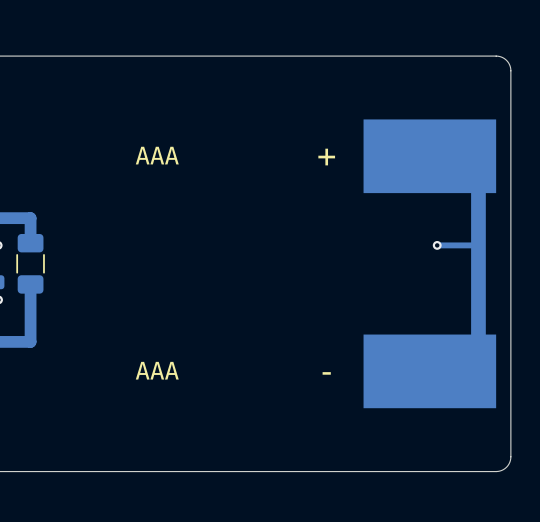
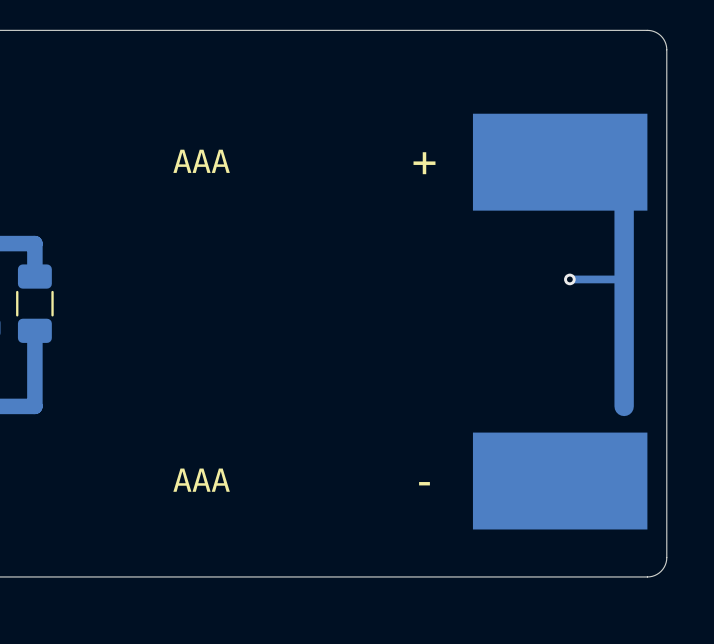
text position: AAA (157, 370) -> AAA (201, 480)
part position: (429, 371) -> (560, 481)
text position: - (326, 373) -> - (424, 483)

